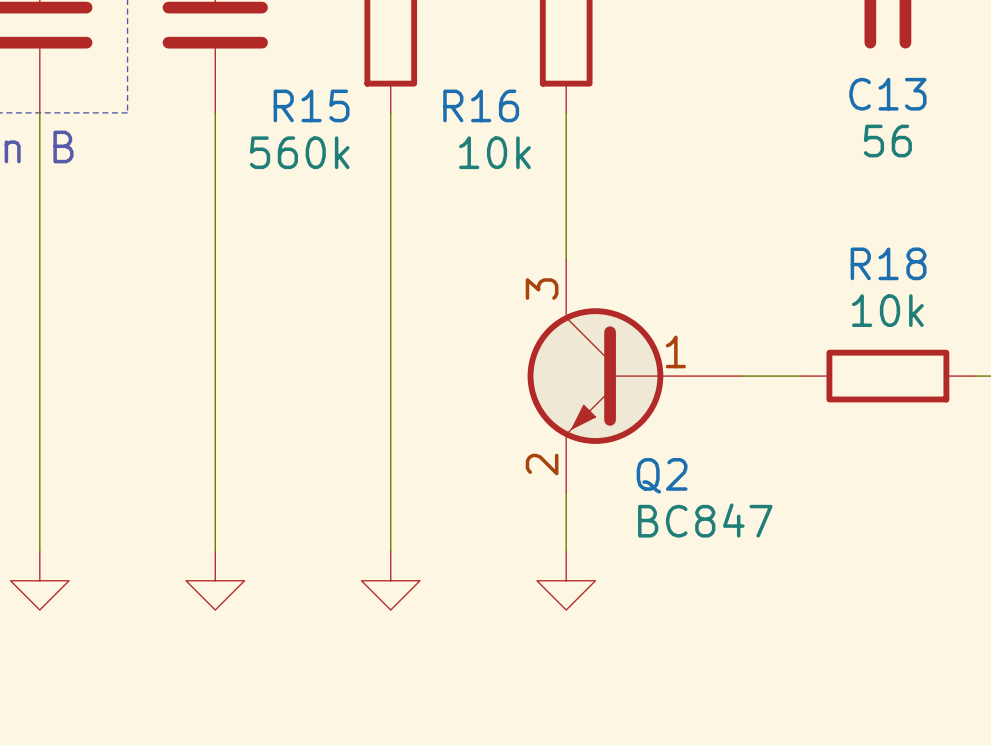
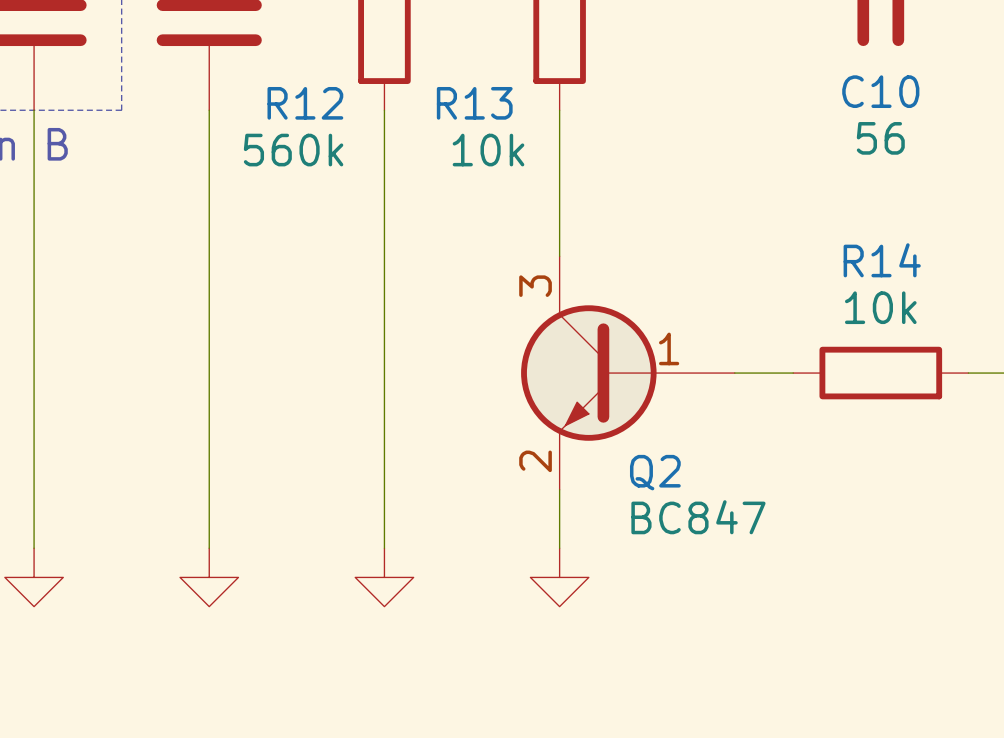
C13 name: C13 (887, 94) -> C10 (880, 91)
R15 name: R15 (311, 105) -> R12 (305, 103)
R16 name: R16 (481, 105) -> R13 (474, 103)
R18 name: R18 (888, 263) -> R14 (882, 260)

